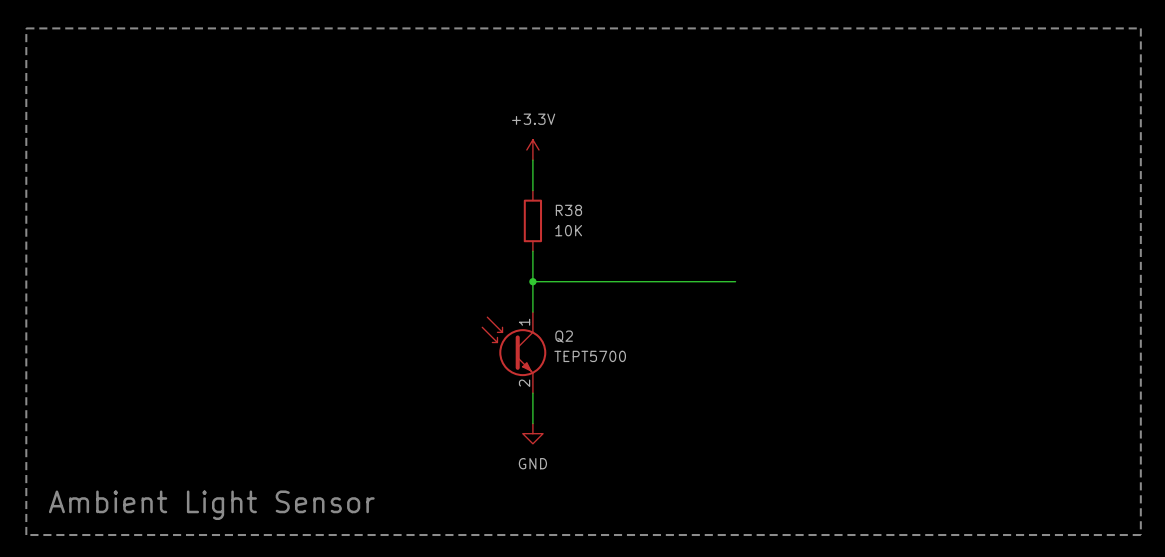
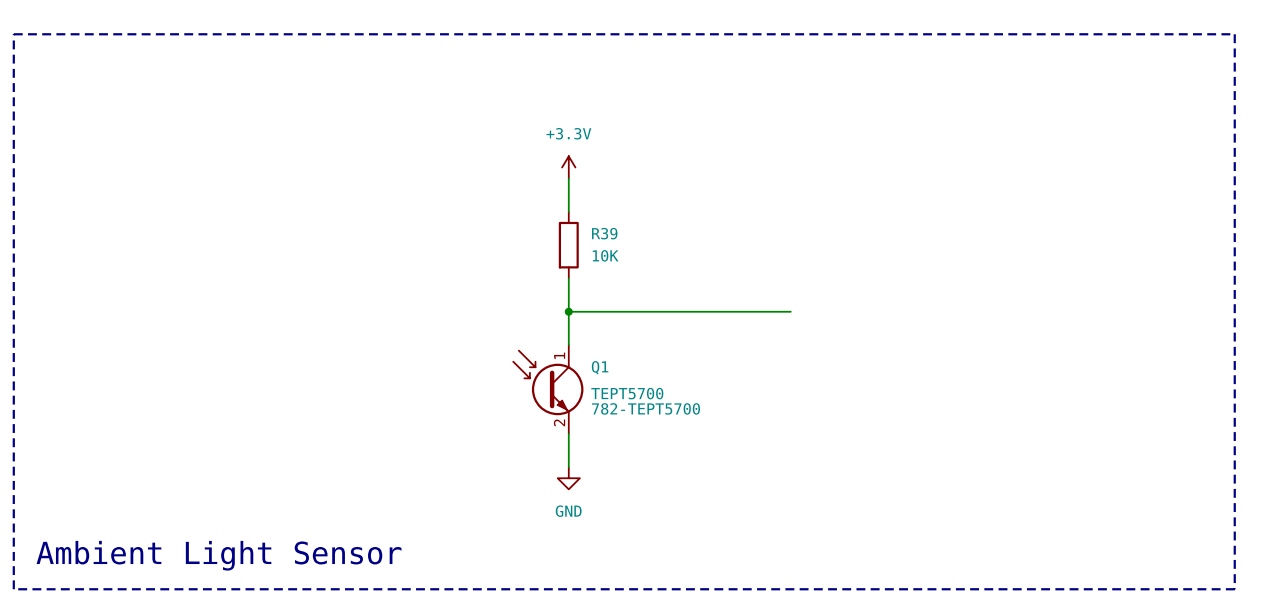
R38 name: R38 (568, 210) -> R39 (604, 233)
Q2 name: Q2 (564, 336) -> Q1 (600, 367)
Q2 text: none -> 782-TEPT5700 (646, 408)

